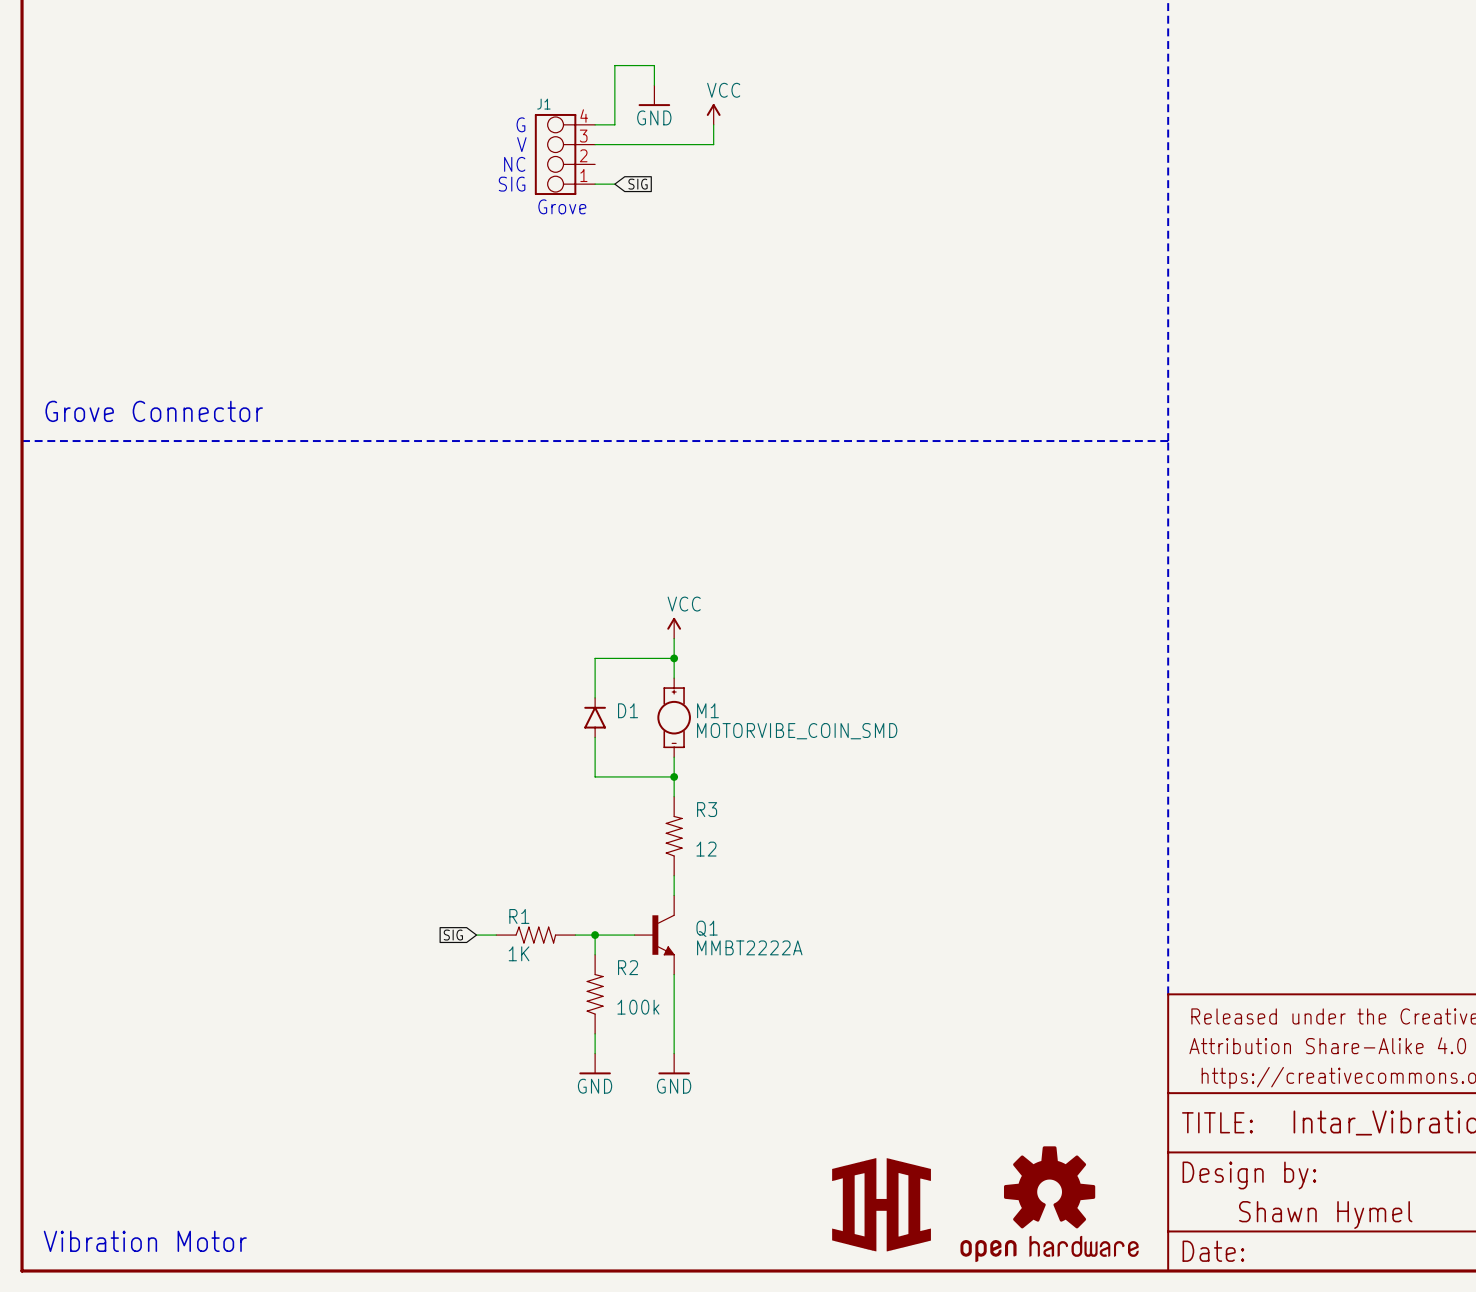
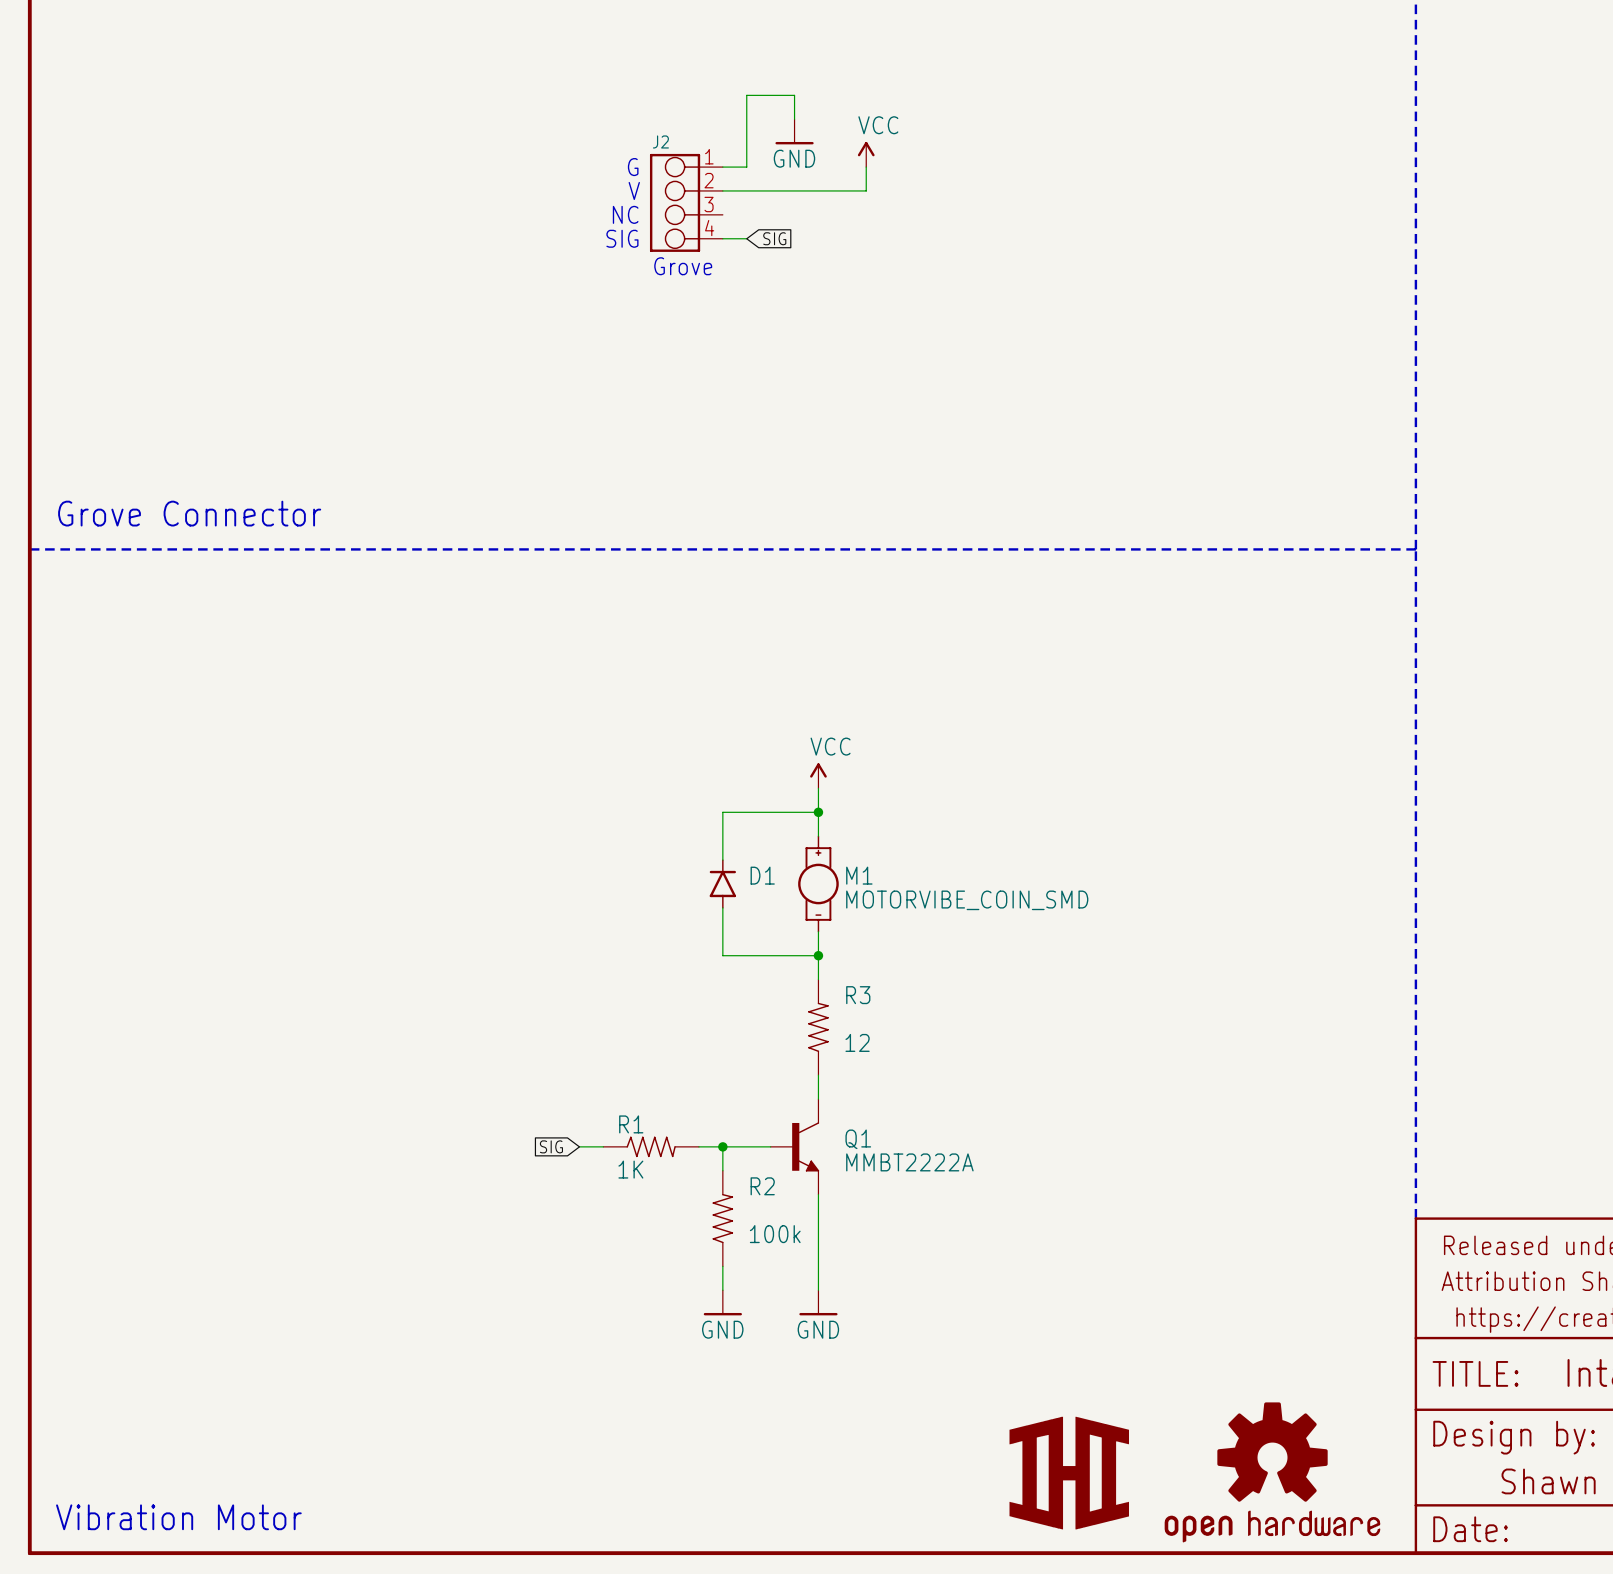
J1 name: J1 (543, 104) -> J2 (660, 141)
J1 flip: as is (555, 154) -> up-down (675, 202)

